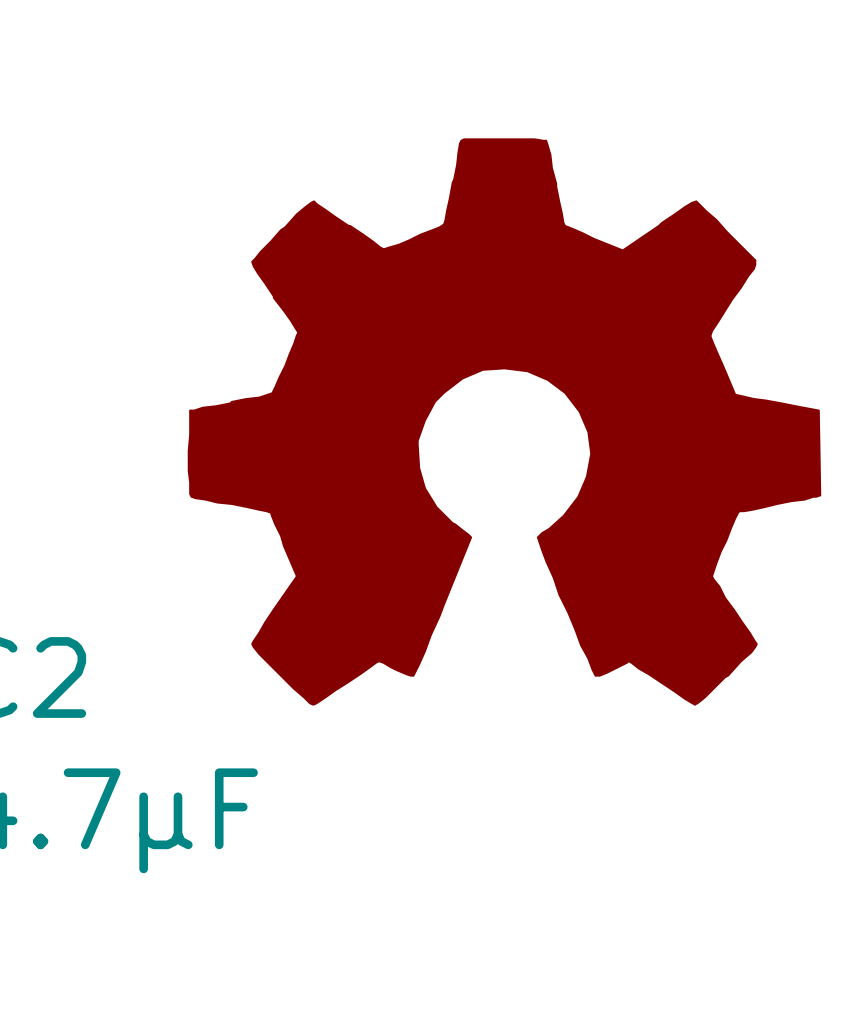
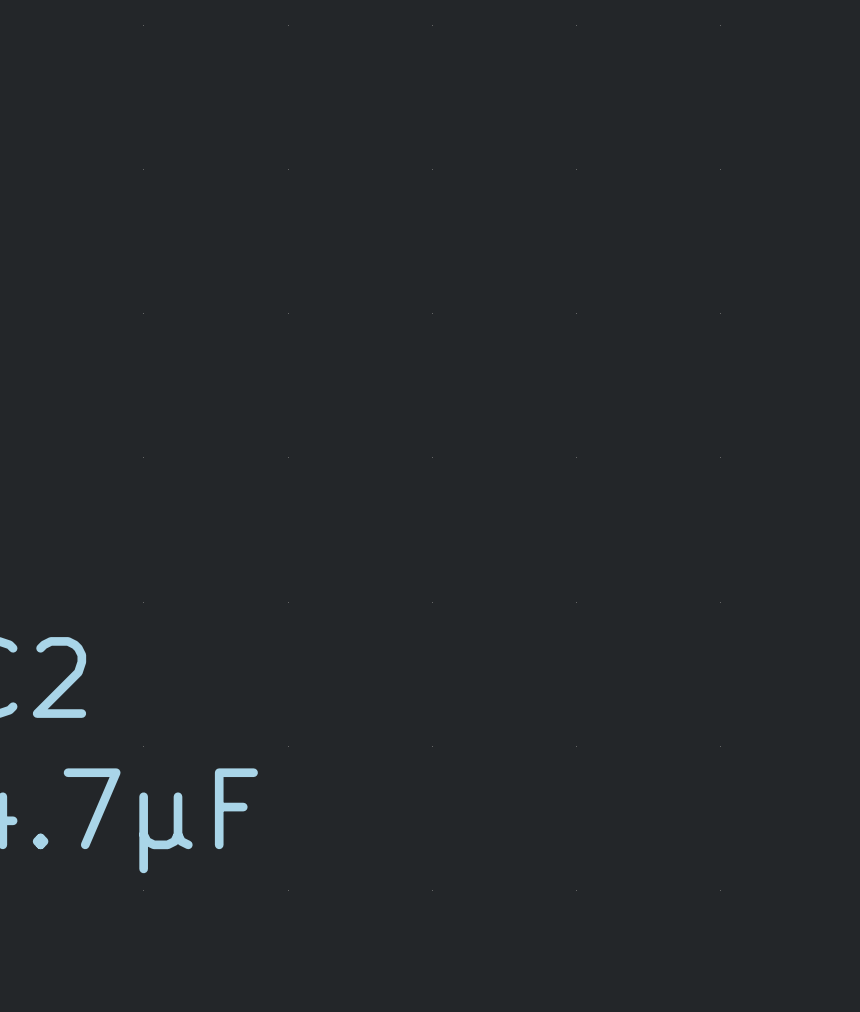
power symbol: (504, 421) -> none

